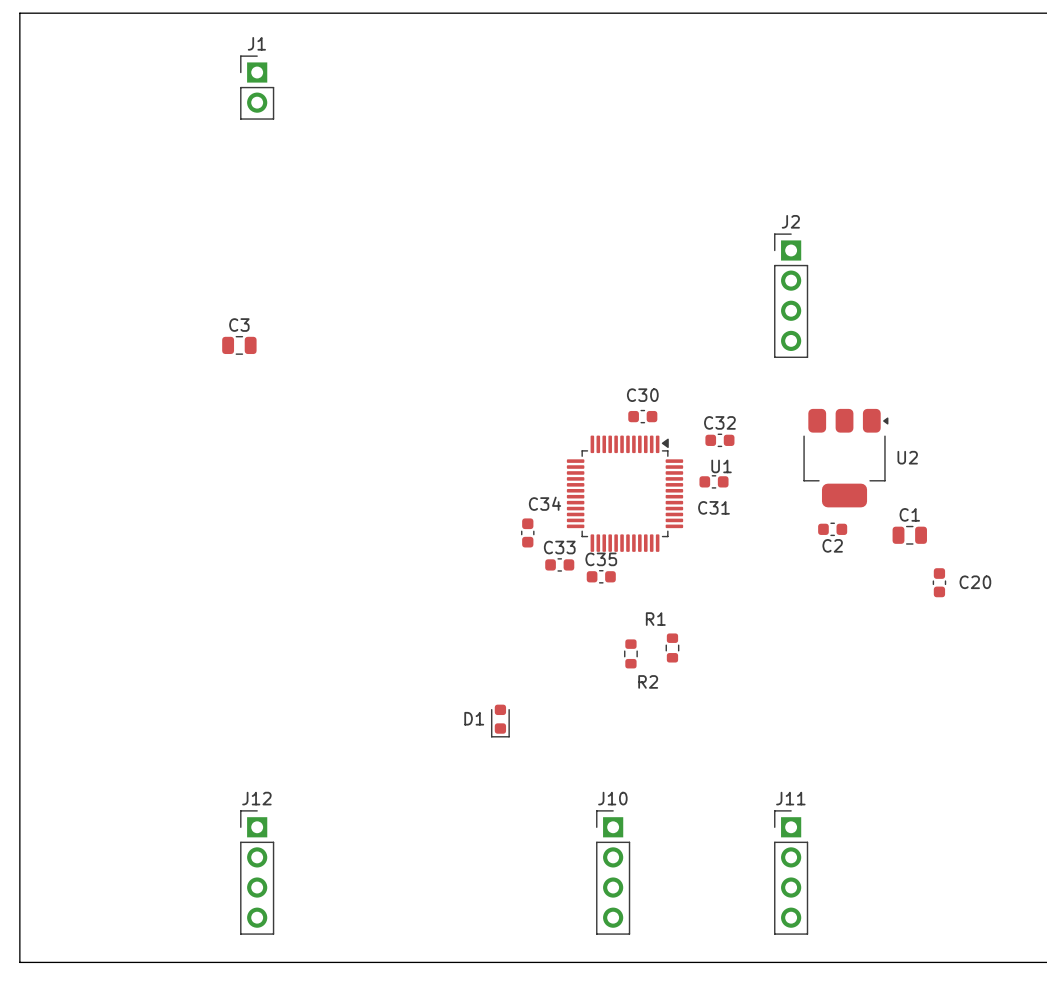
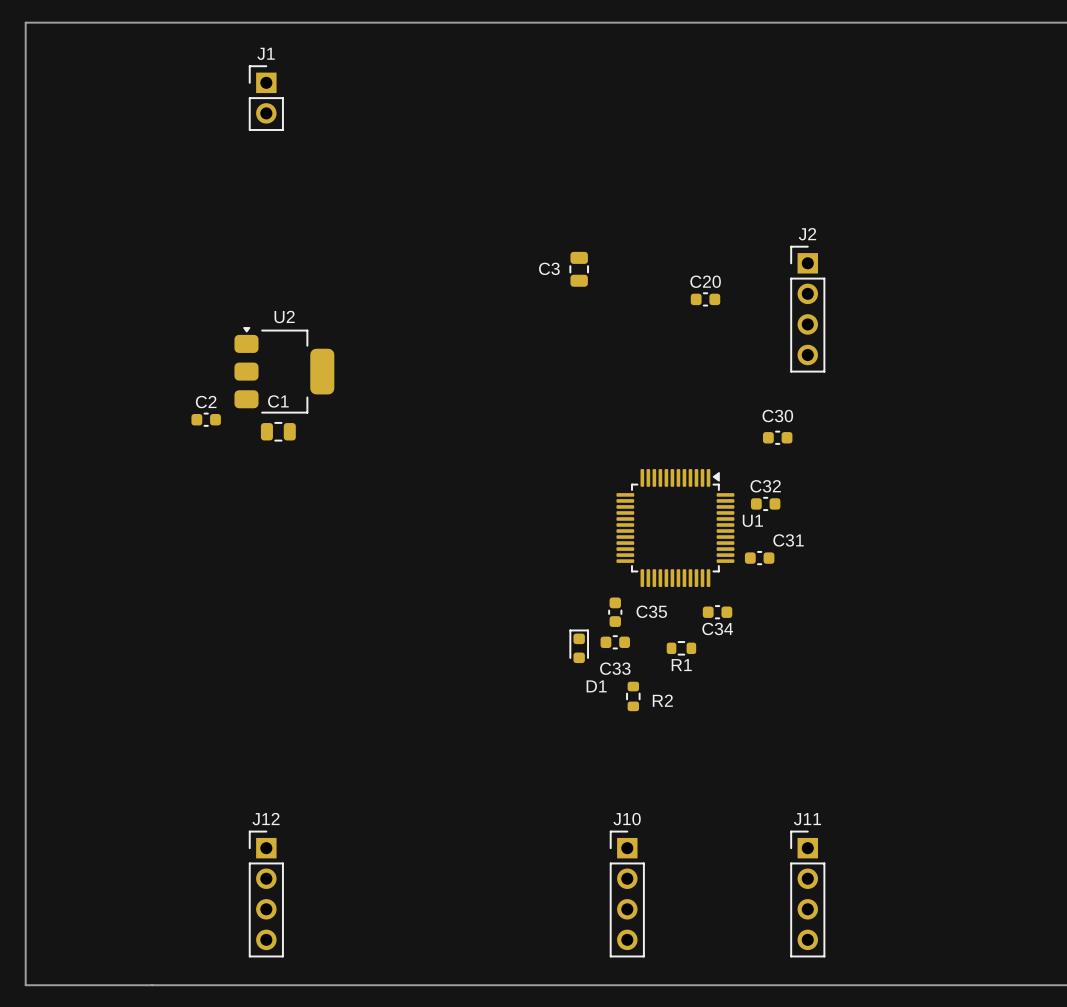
C3 name position: C3 (239, 325) -> C3 (549, 268)
C3 rotation: 0° (239, 345) -> 90° clockwise (579, 269)
C3 position: (239, 345) -> (579, 269)
C30 position: (642, 416) -> (777, 437)
C32 position: (719, 440) -> (765, 503)
U2 rotation: 0° (845, 458) -> 90° counterclockwise (284, 370)
U2 position: (845, 458) -> (284, 370)
U1 name position: U1 (721, 466) -> U1 (752, 520)
C31 position: (713, 481) -> (759, 558)
U1 position: (625, 493) -> (675, 528)
C34 name position: C34 (545, 503) -> C34 (717, 628)
C31 name position: C31 (713, 507) -> C31 (788, 540)
C1 name position: C1 (909, 514) -> C1 (278, 401)
C2 position: (832, 529) -> (206, 419)
C34 rotation: 0° (527, 532) -> 90° clockwise (717, 612)
C34 position: (527, 532) -> (717, 612)
C1 position: (909, 535) -> (278, 431)
C2 name position: C2 (832, 545) -> C2 (206, 402)
C33 name position: C33 (559, 547) -> C33 (615, 668)
C33 position: (559, 564) -> (615, 642)
C35 rotation: 0° (601, 576) -> 90° clockwise (615, 612)
C35 position: (601, 576) -> (615, 612)
C20 rotation: 0° (939, 582) -> 90° clockwise (705, 299)
C20 position: (939, 582) -> (705, 299)
C20 name position: C20 (975, 582) -> C20 (705, 281)
R1 name position: R1 (655, 619) -> R1 (681, 665)
R1 rotation: 0° (672, 647) -> 90° clockwise (681, 648)
R1 position: (672, 647) -> (681, 648)
R2 position: (630, 653) -> (633, 696)
D1 name position: D1 (474, 718) -> D1 (596, 686)
D1 rotation: 0° (500, 721) -> 180° (579, 646)
D1 position: (500, 721) -> (579, 646)

